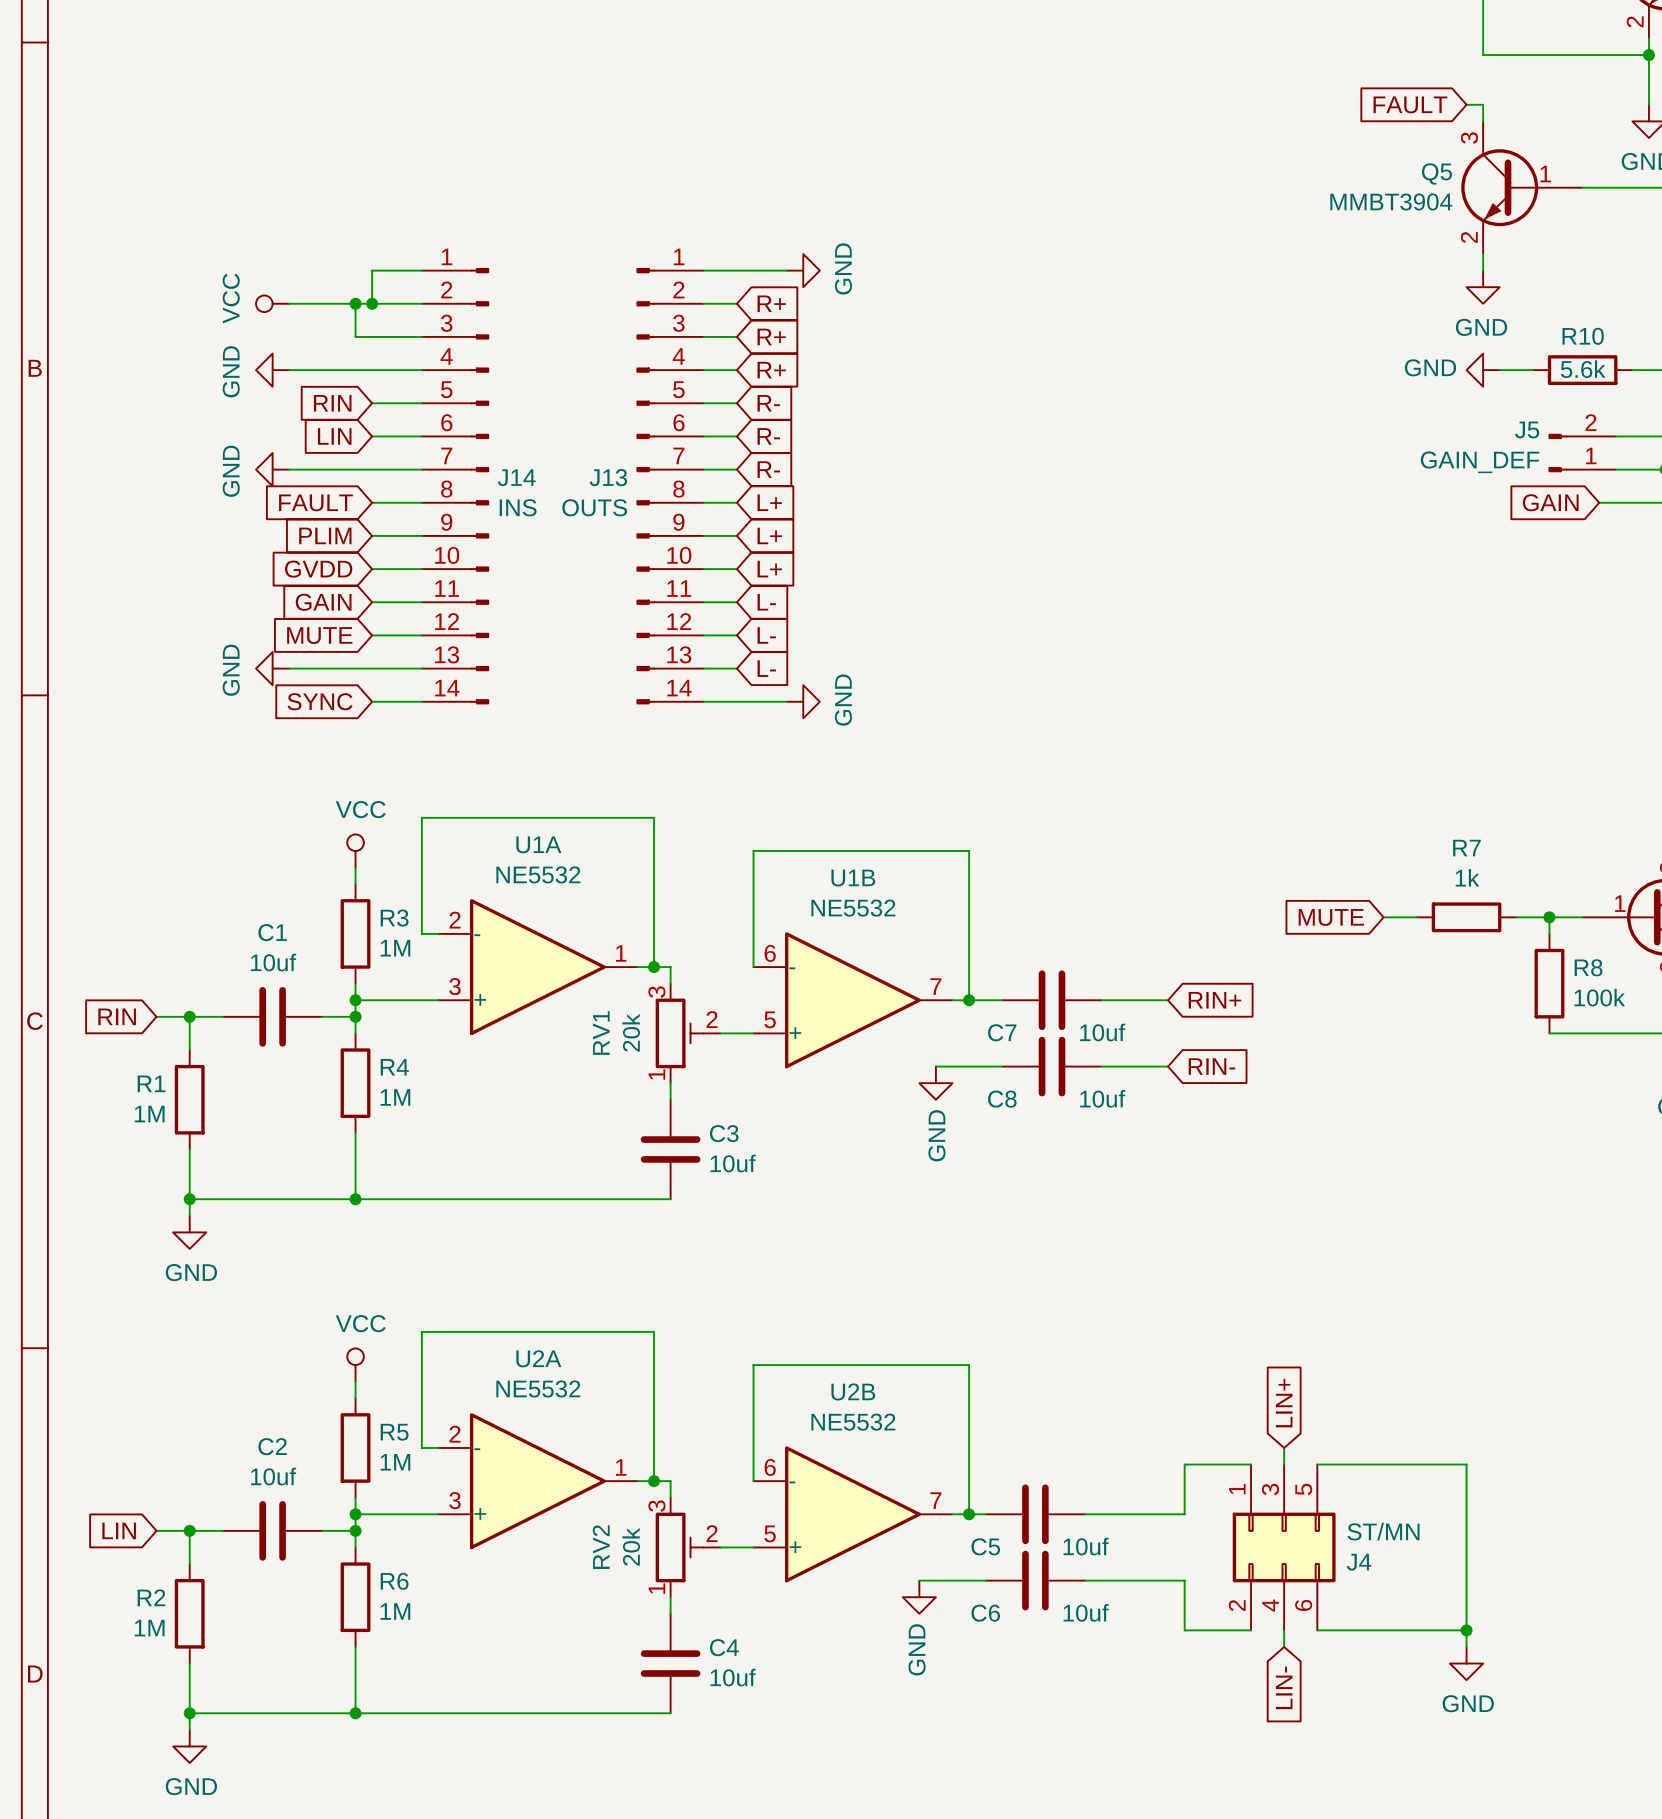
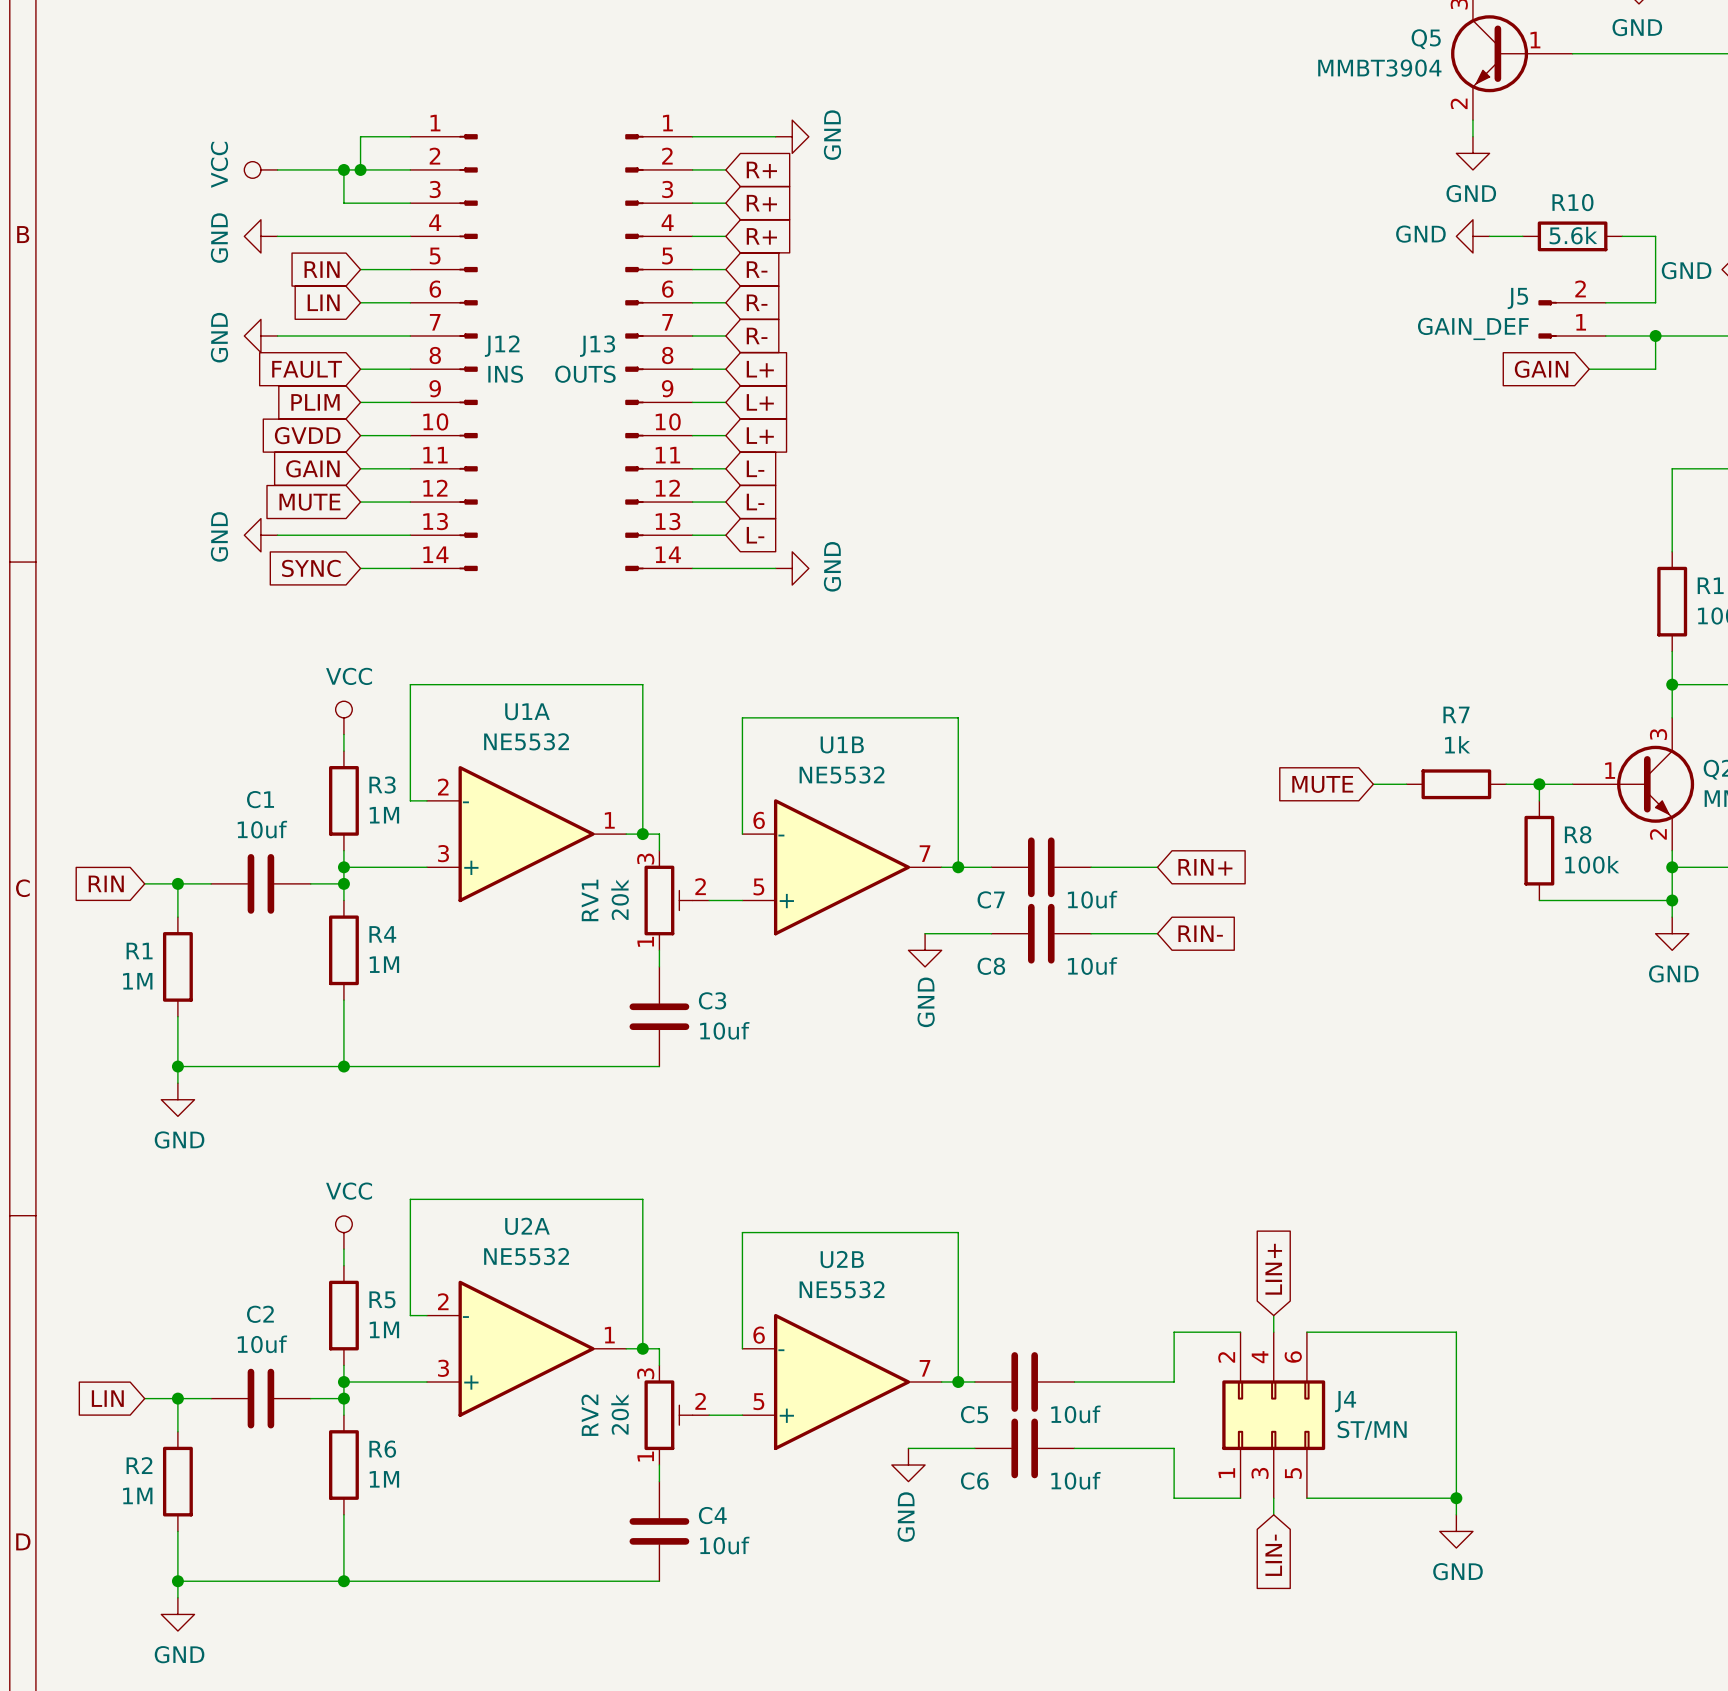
J14 name: J14 (516, 477) -> J12 (502, 346)
J4 flip: as is (1284, 1547) -> up-down (1273, 1415)

